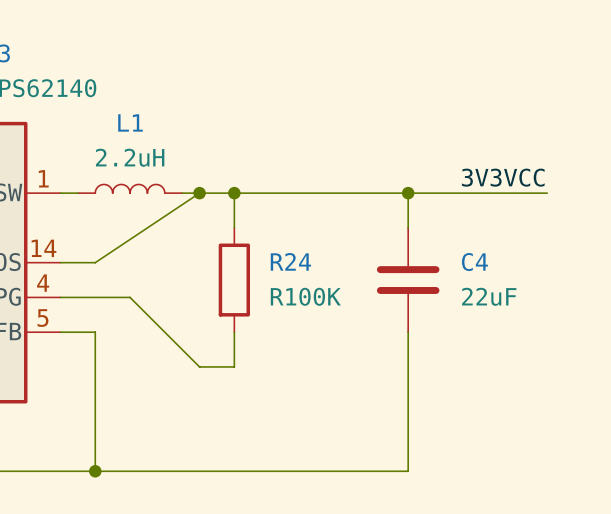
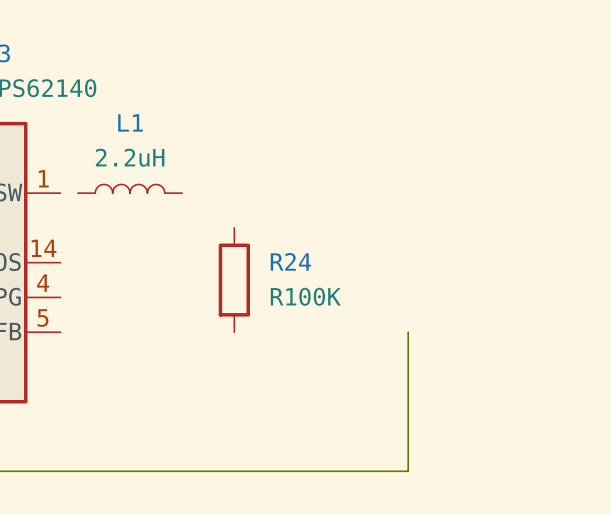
label: 3V3VCC (503, 177) -> none
wire: (60, 193) (77, 193) -> none
wire: (182, 193) (547, 193) -> none
wire: (199, 193) (95, 262) (60, 262) -> none
junction: (199, 193) -> none
wire: (234, 193) (234, 227) -> none
junction: (234, 193) -> none
wire: (408, 193) (408, 227) -> none
junction: (408, 193) -> none
C4: 22uF (408, 280) -> none
wire: (60, 297) (130, 297) (199, 366) (234, 366) (234, 332) -> none
wire: (60, 332) (95, 332) (95, 471) -> none
junction: (95, 471) -> none

